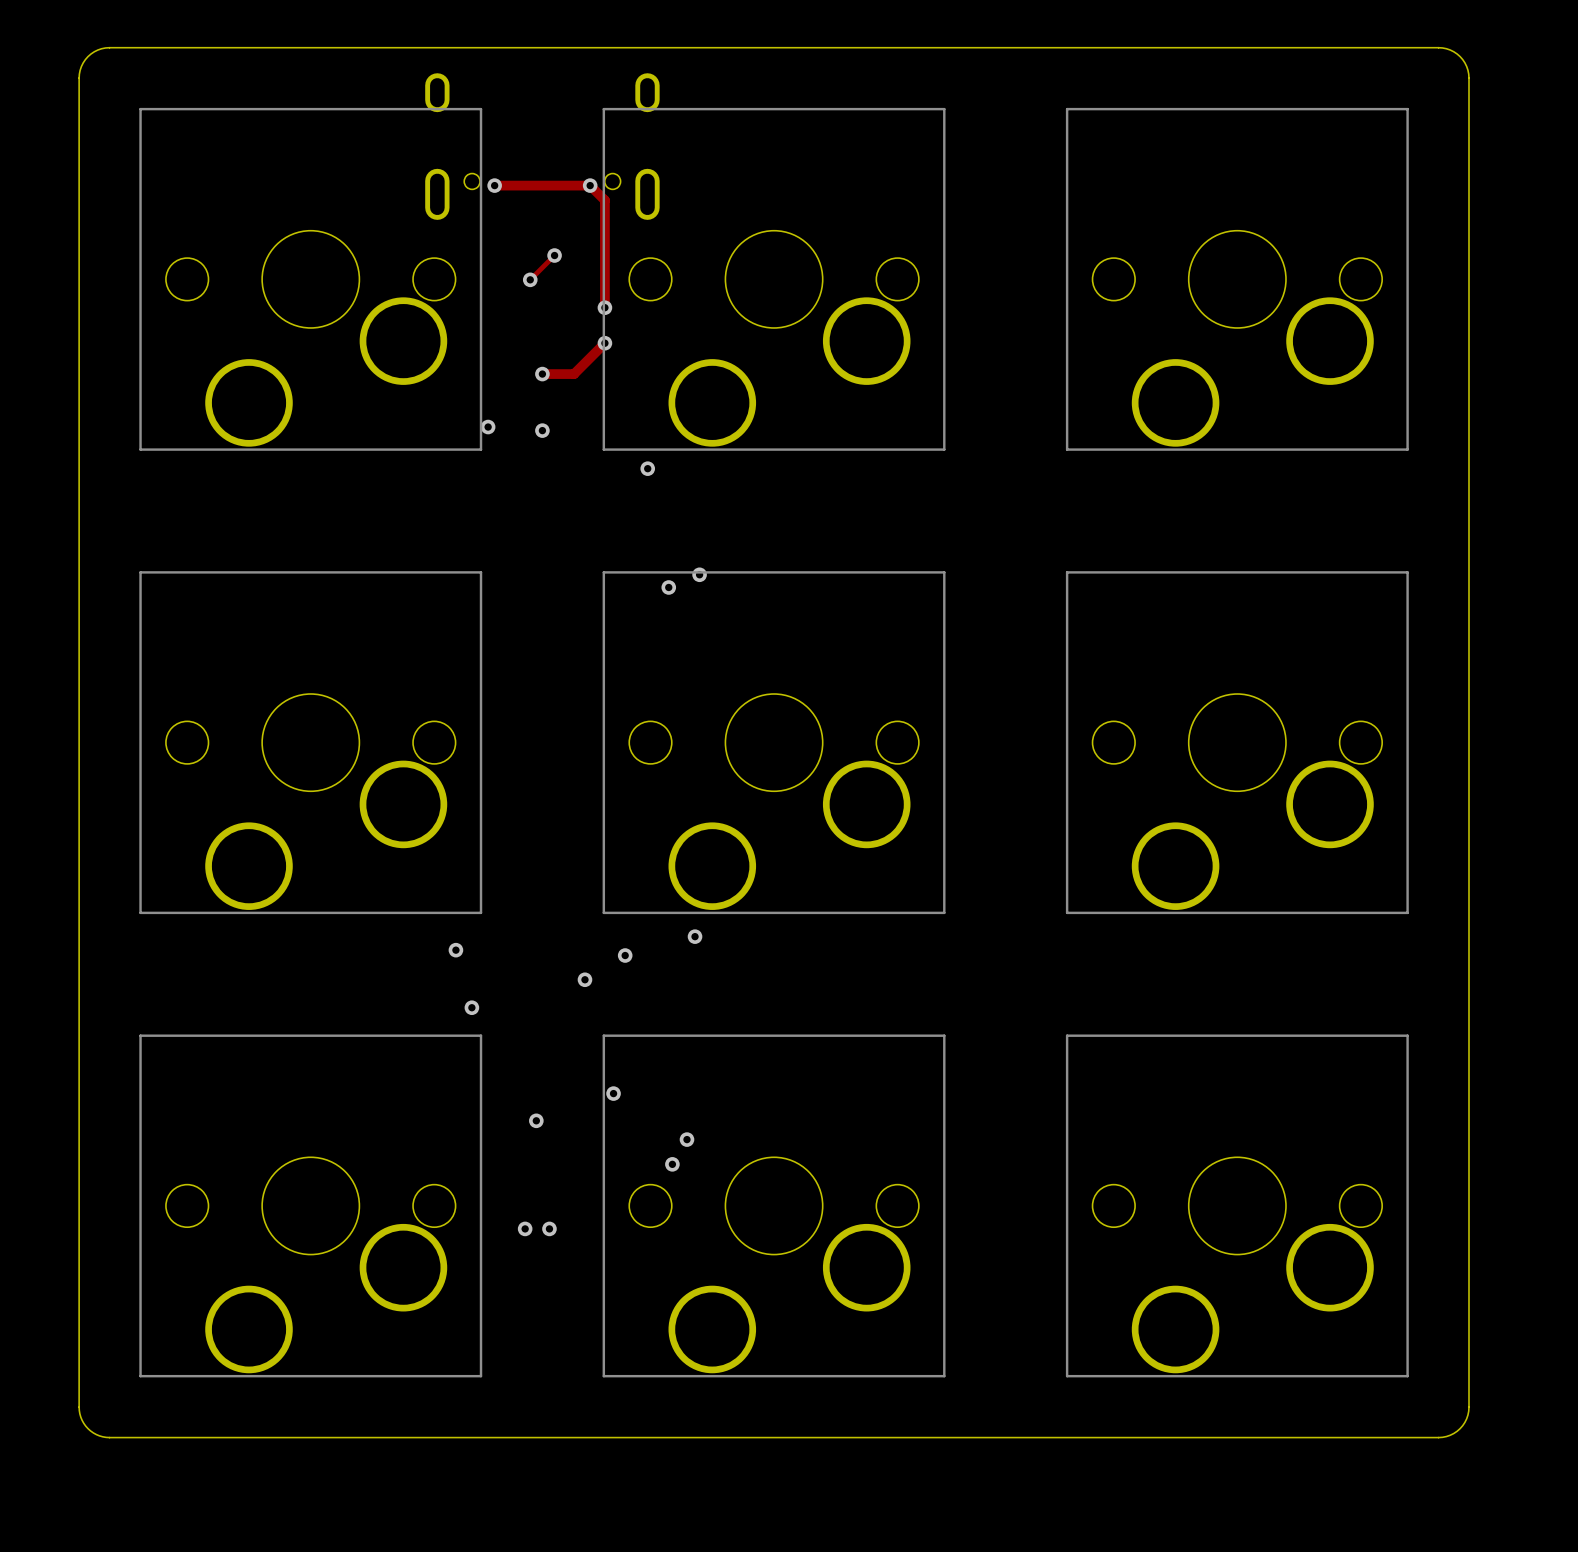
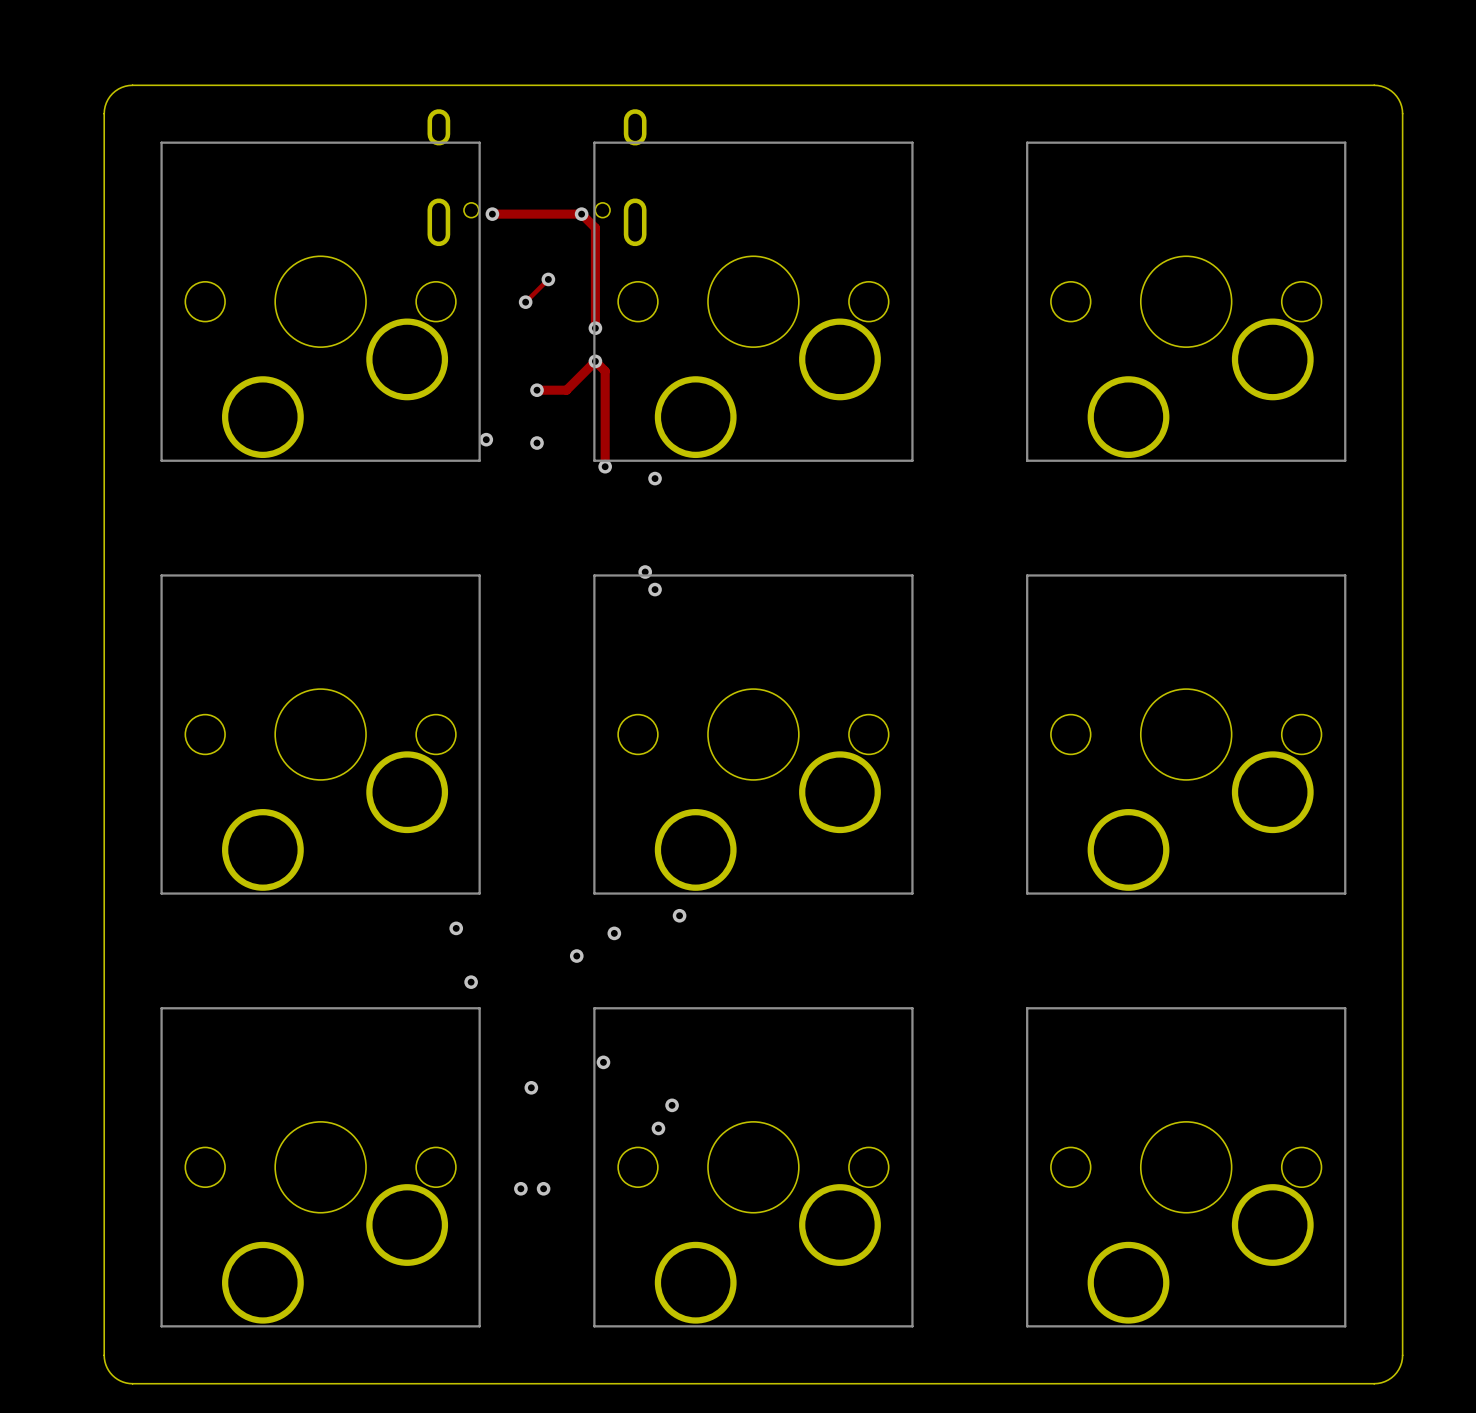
track: none -> (595, 361) (605, 371) (605, 466)
via: none -> (605, 466)
via: (647, 468) -> none
via: none -> (655, 478)
via position: (699, 574) -> (645, 572)

